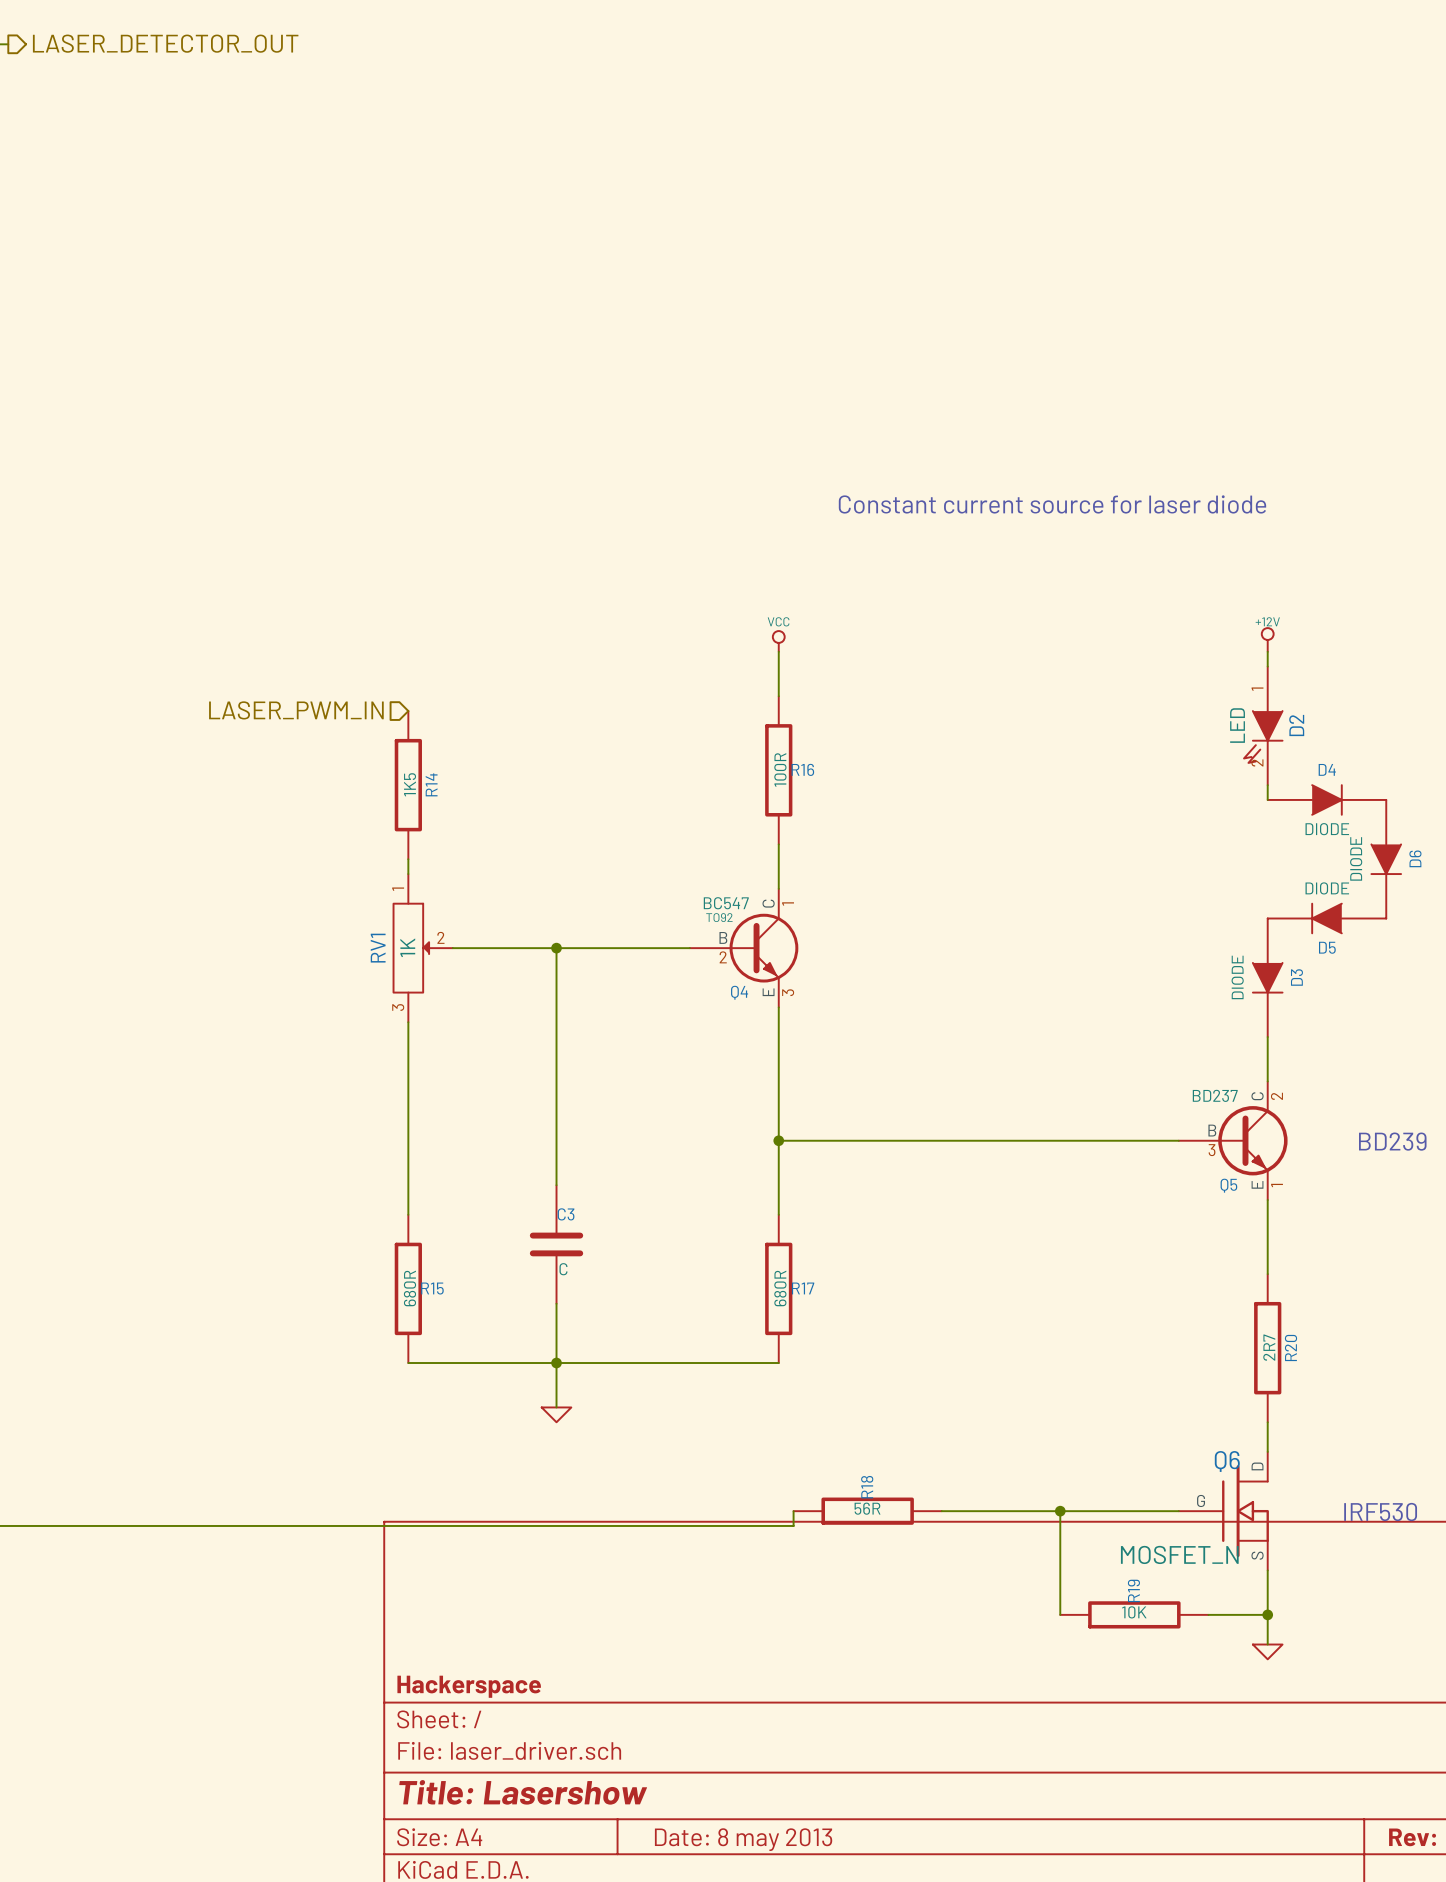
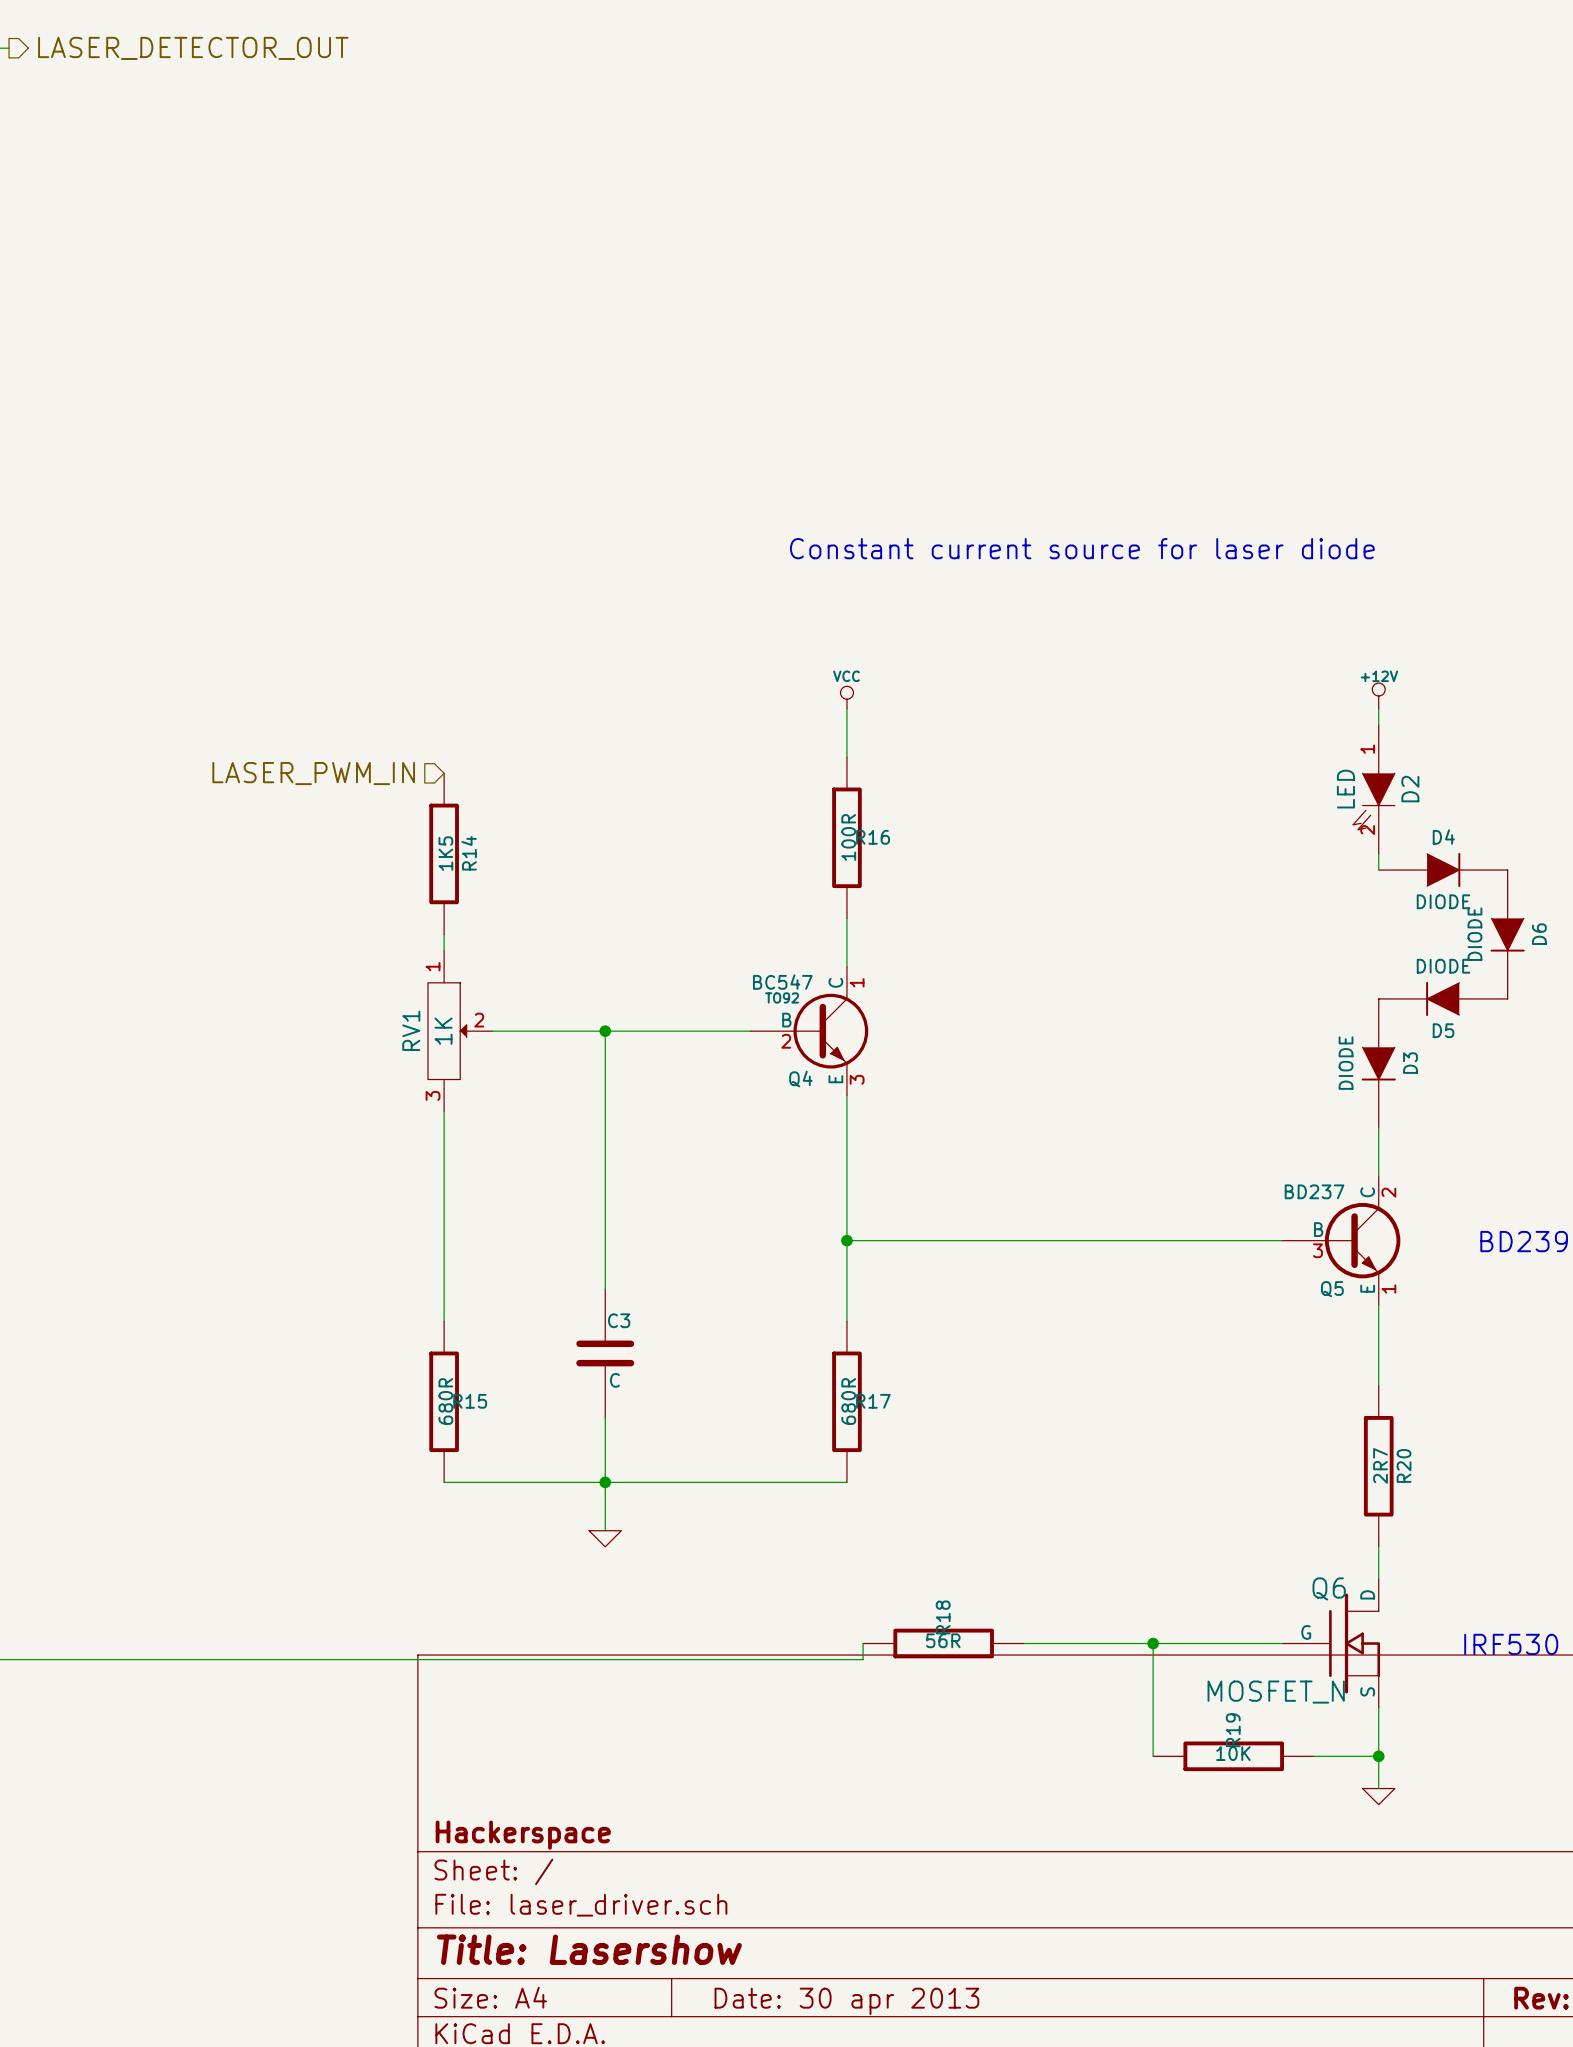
title block: Date: 8 may 2013 (743, 1839) -> Date: 30 apr 2013 (846, 2001)

